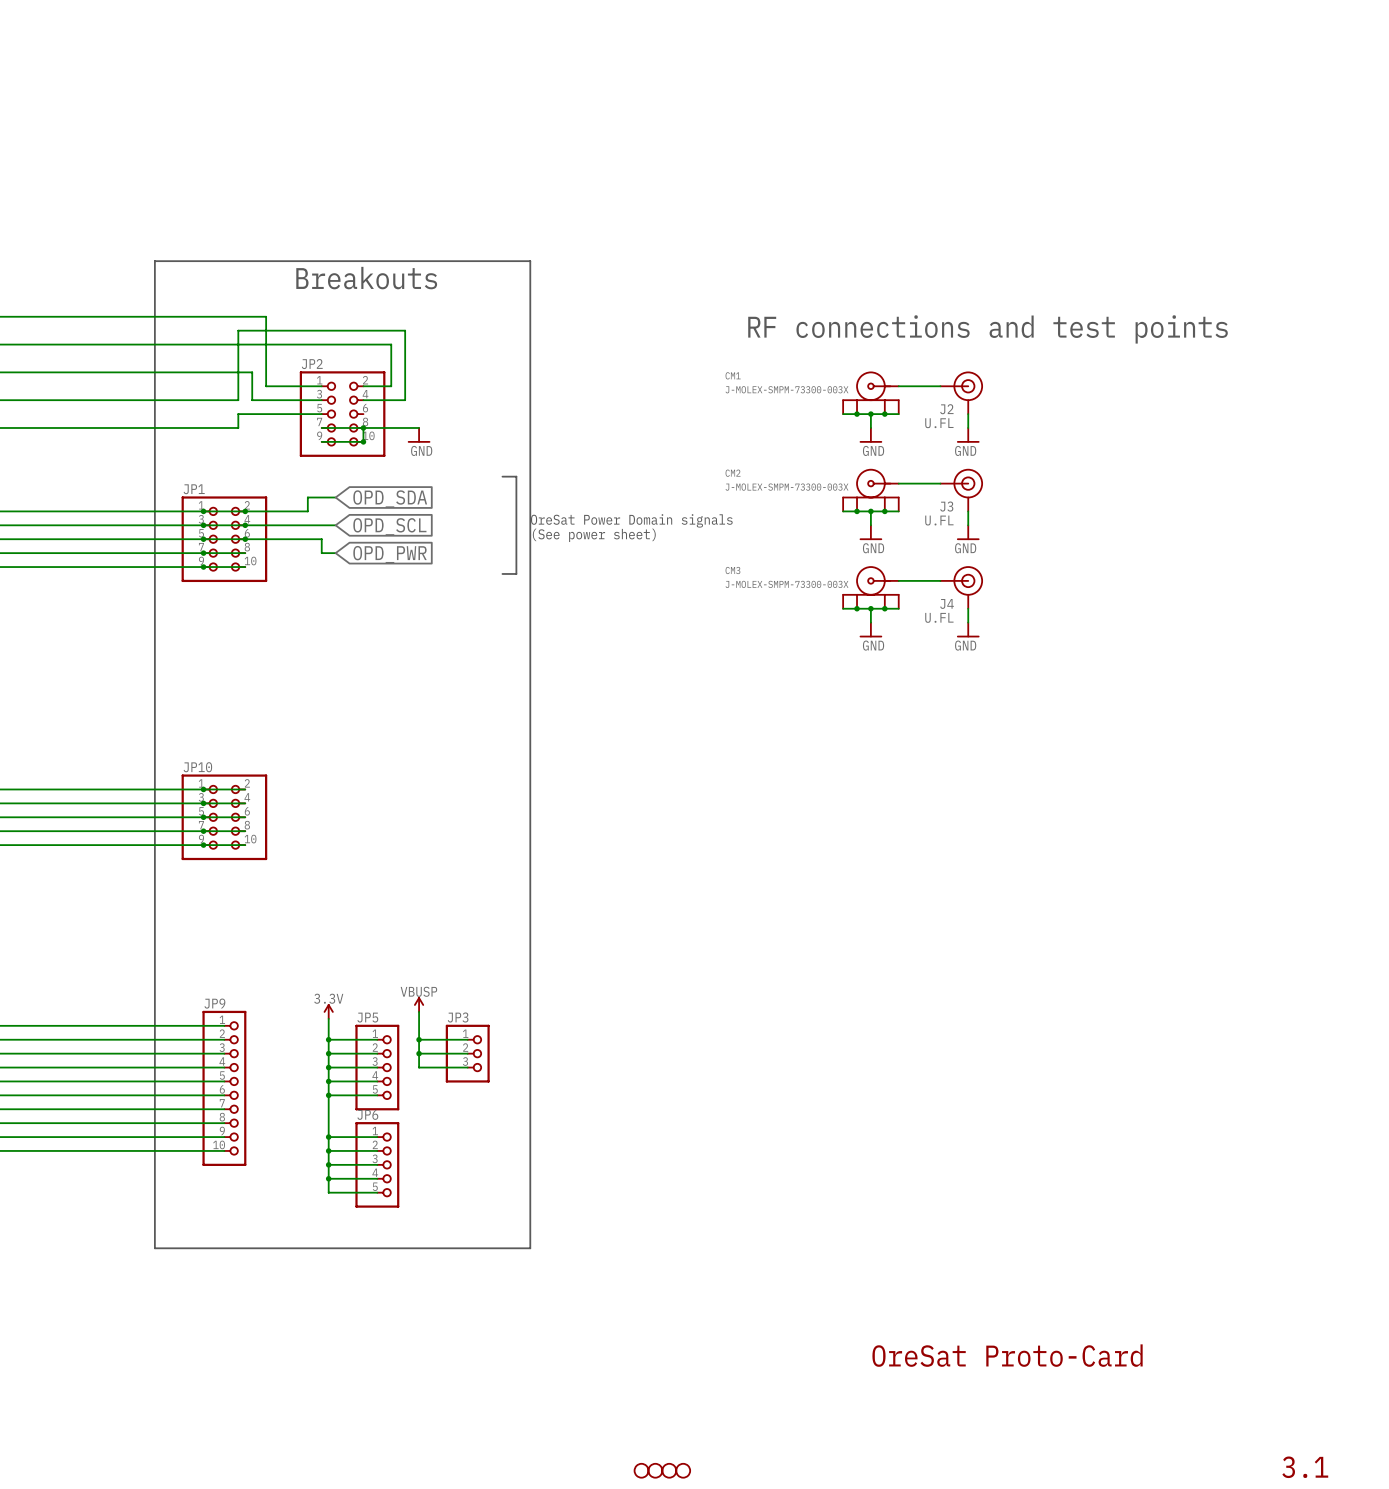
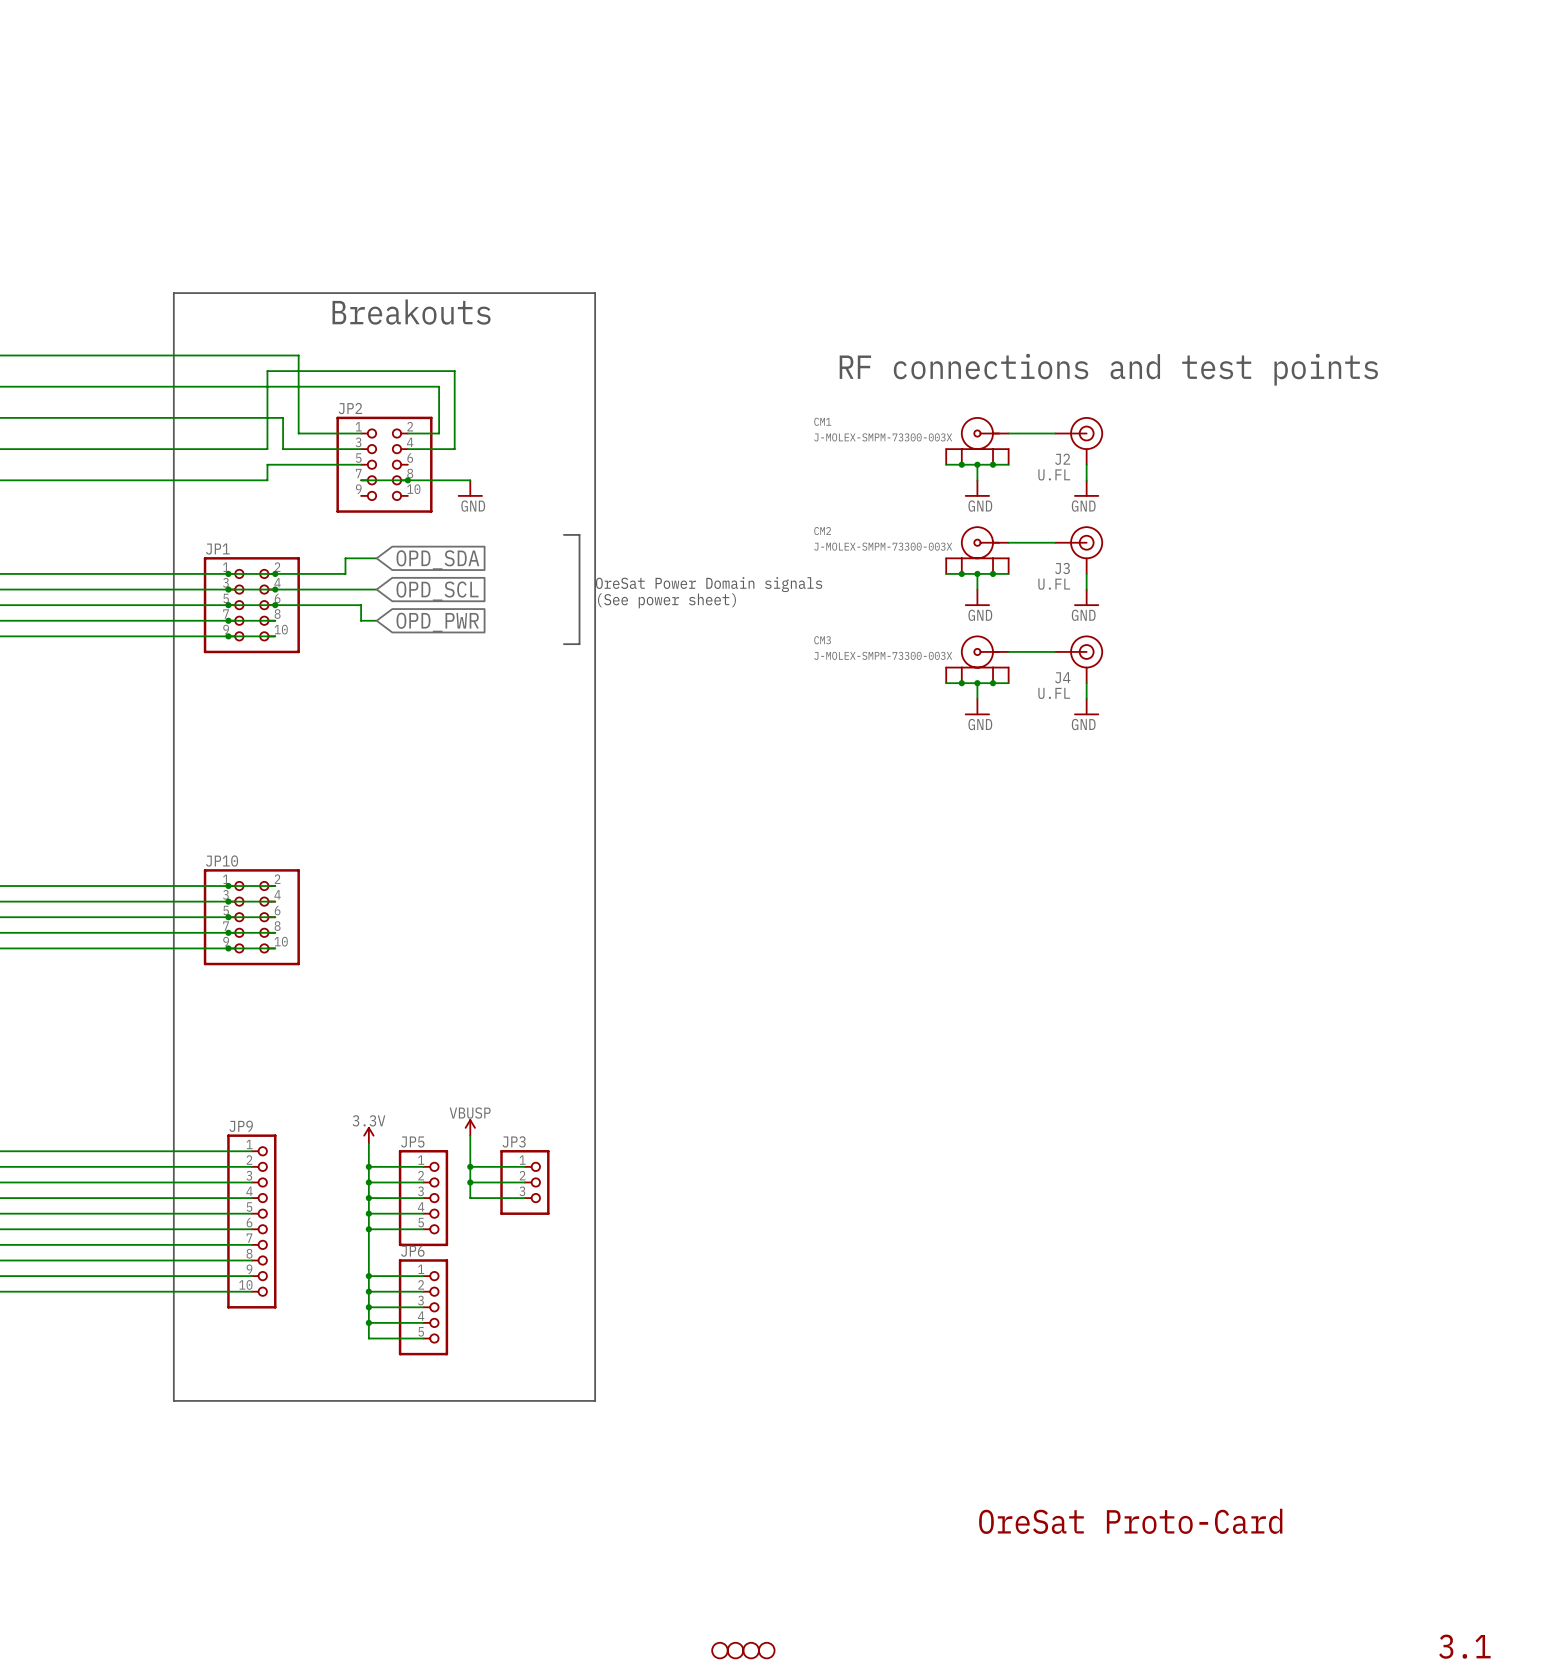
wire: (363, 427) (363, 441) (321, 441) -> none
junction: (363, 441) -> none

